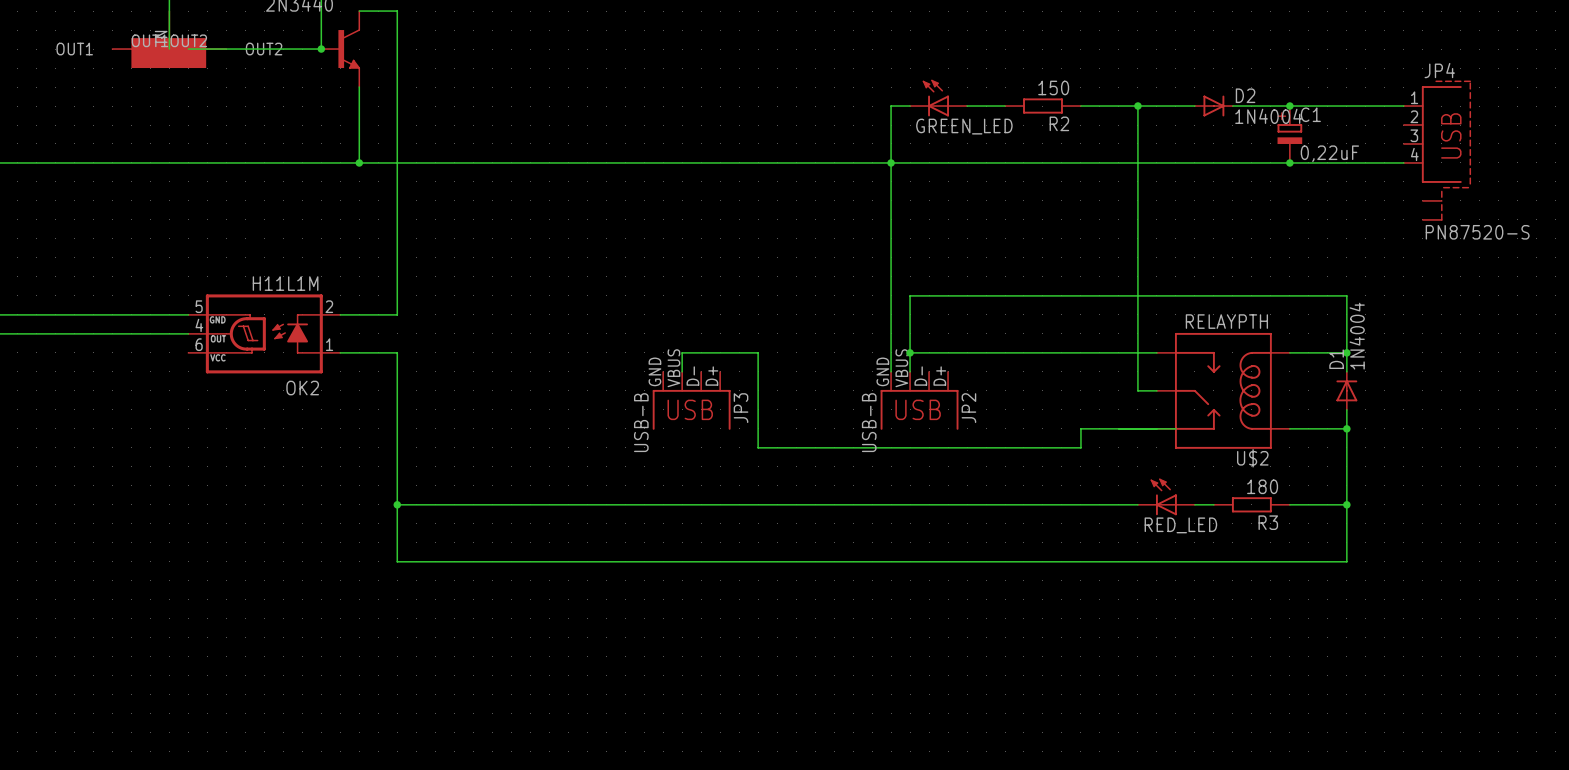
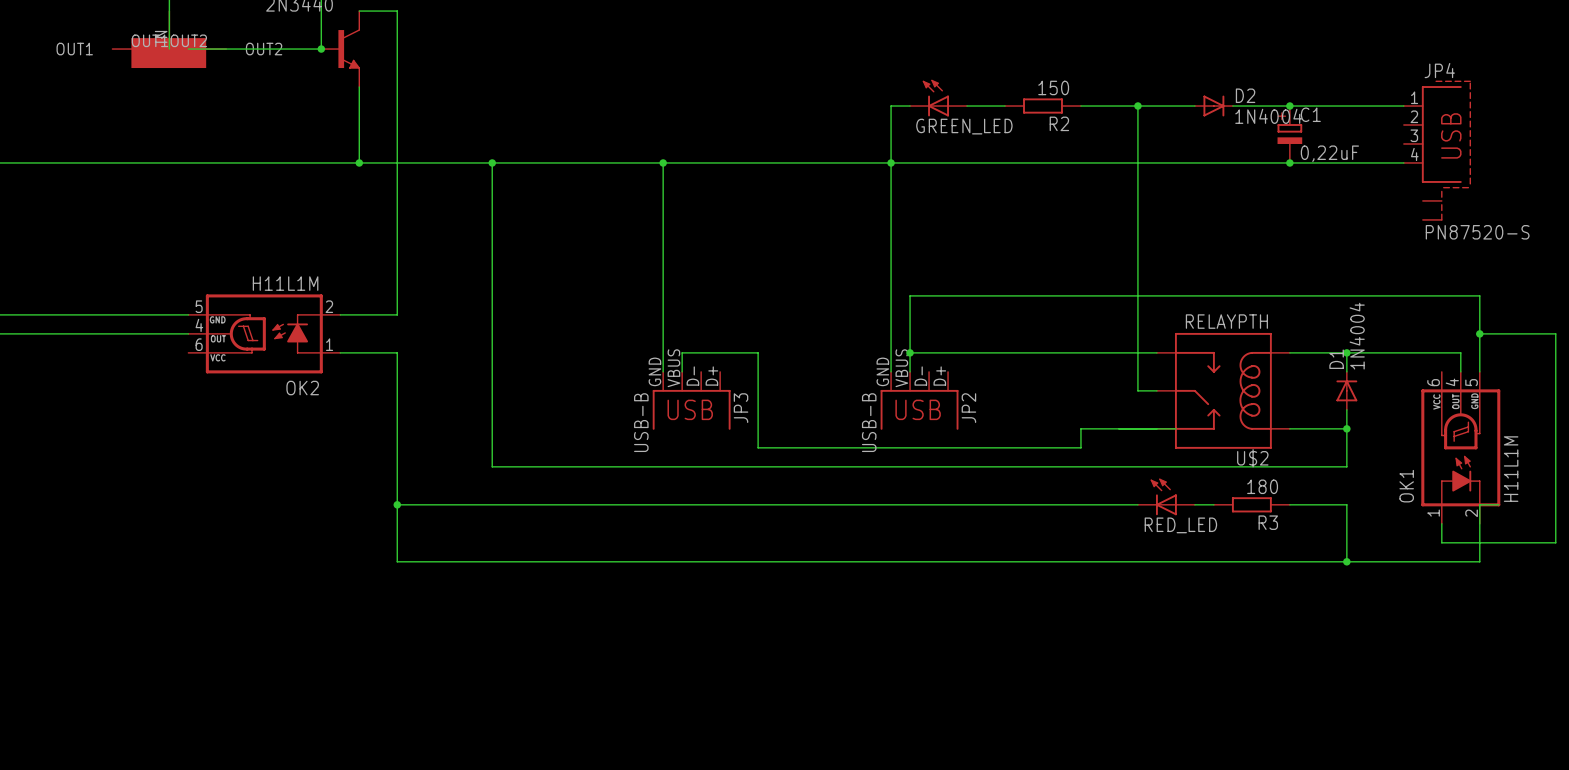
junction: none -> (492, 162)
wire: none -> (663, 162) (663, 371)
junction: none -> (663, 162)
wire: (1346, 295) (1346, 352) -> (1346, 295) (1479, 295) (1479, 371)
wire: none -> (1479, 333) (1555, 333) (1555, 542) (1441, 542) (1441, 523)
junction: none -> (1479, 333)
wire: none -> (1346, 352) (1460, 352) (1460, 371)
OK1: none -> H11L1M (1460, 447)
wire: (1346, 466) (1346, 504) -> (1346, 466) (492, 466) (492, 162)
junction: (1346, 504) -> none
wire: none -> (1498, 504) (1479, 504) (1479, 561) (1346, 561)
junction: none -> (1346, 561)

